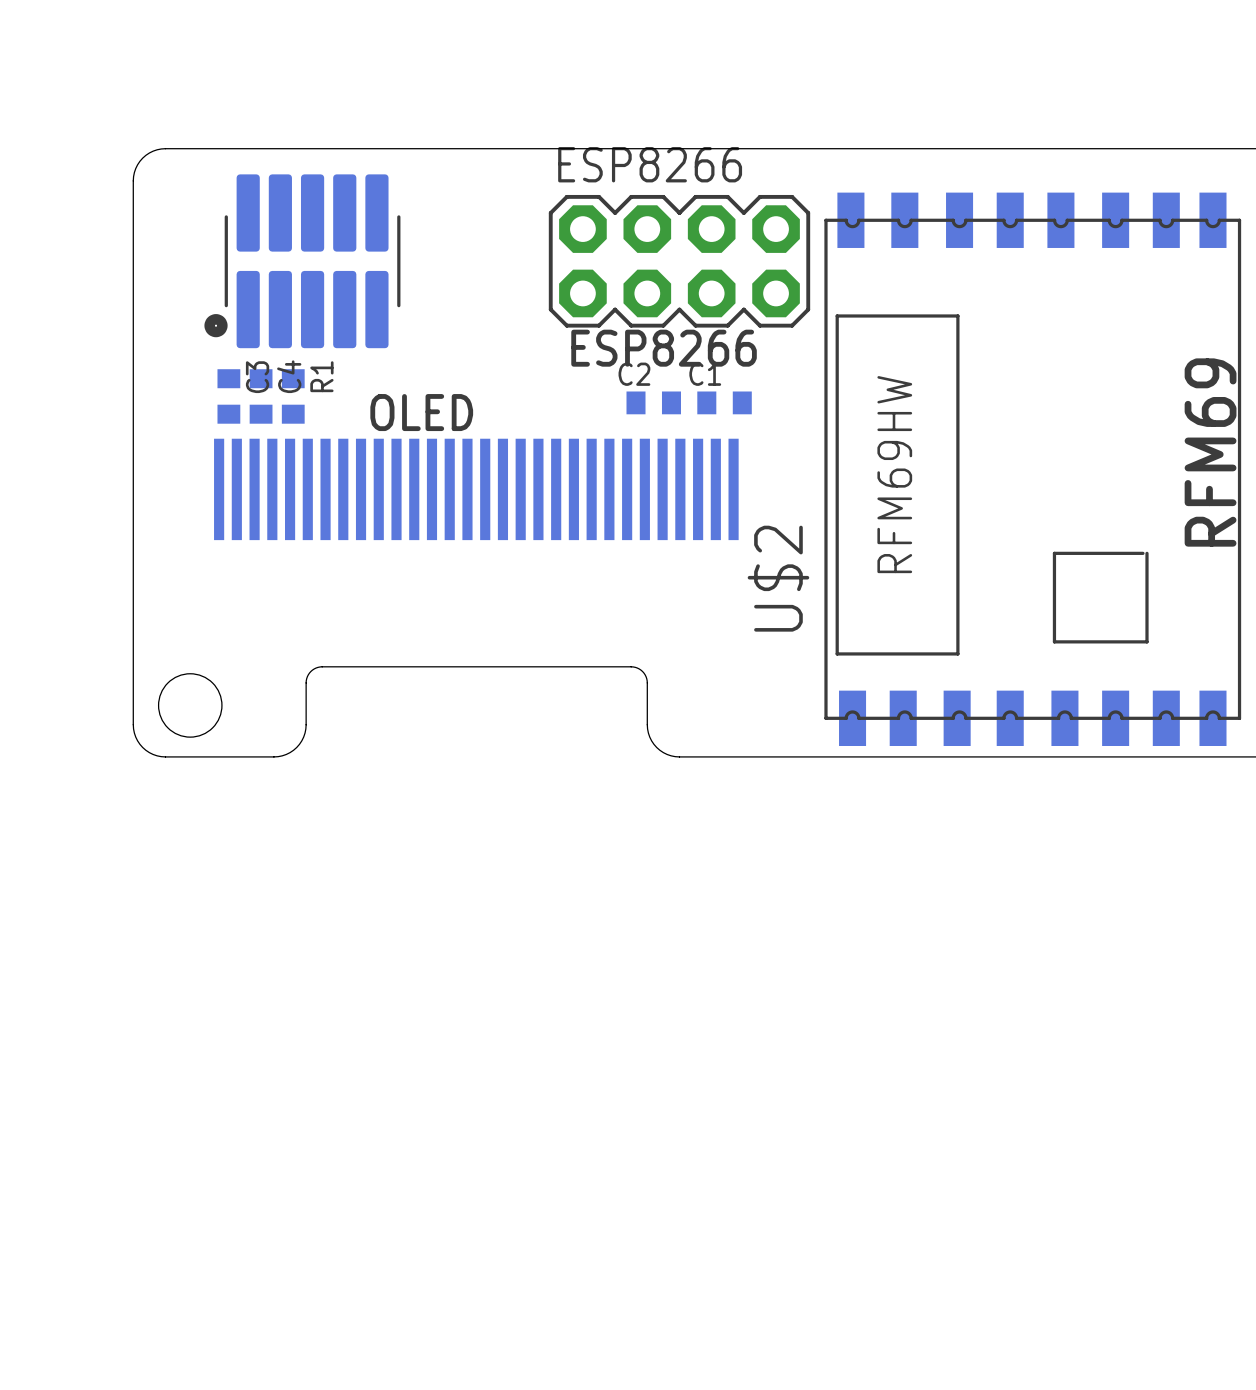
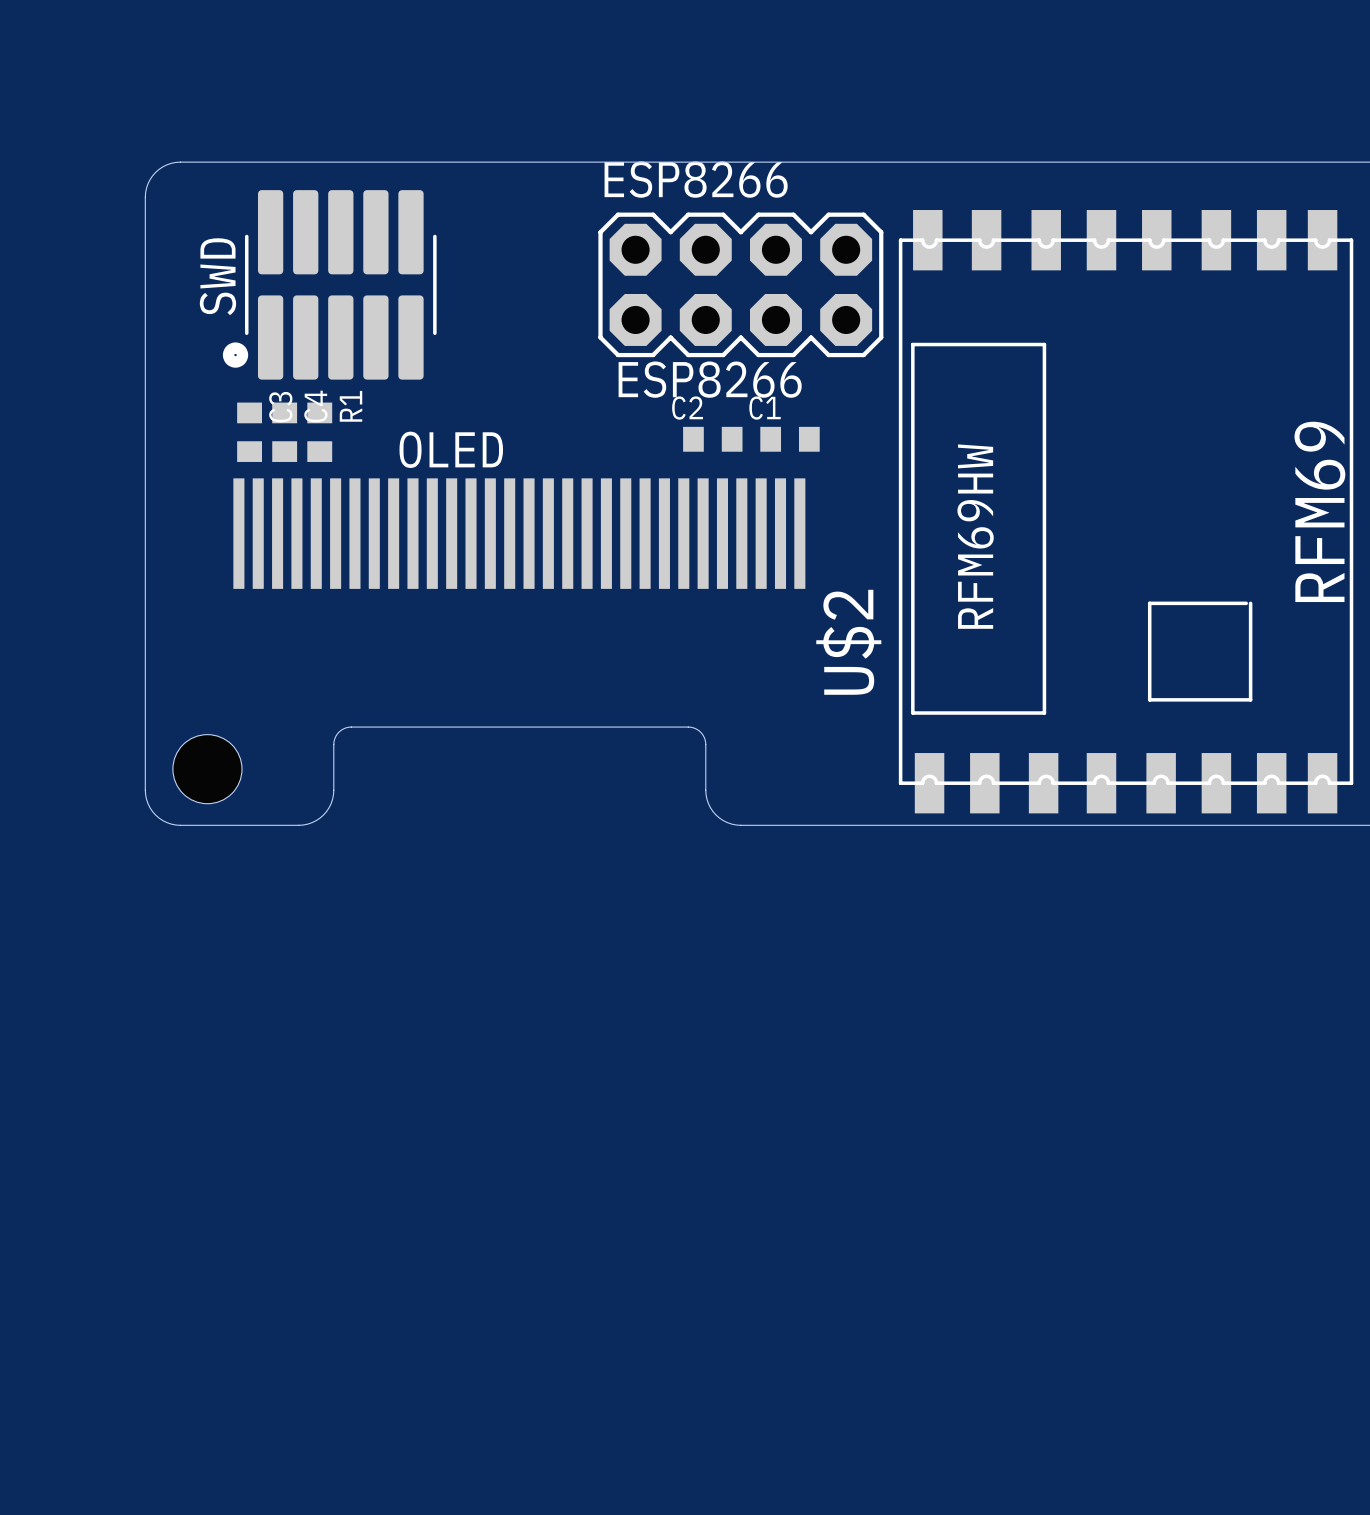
text: none -> SWD (217, 276)

